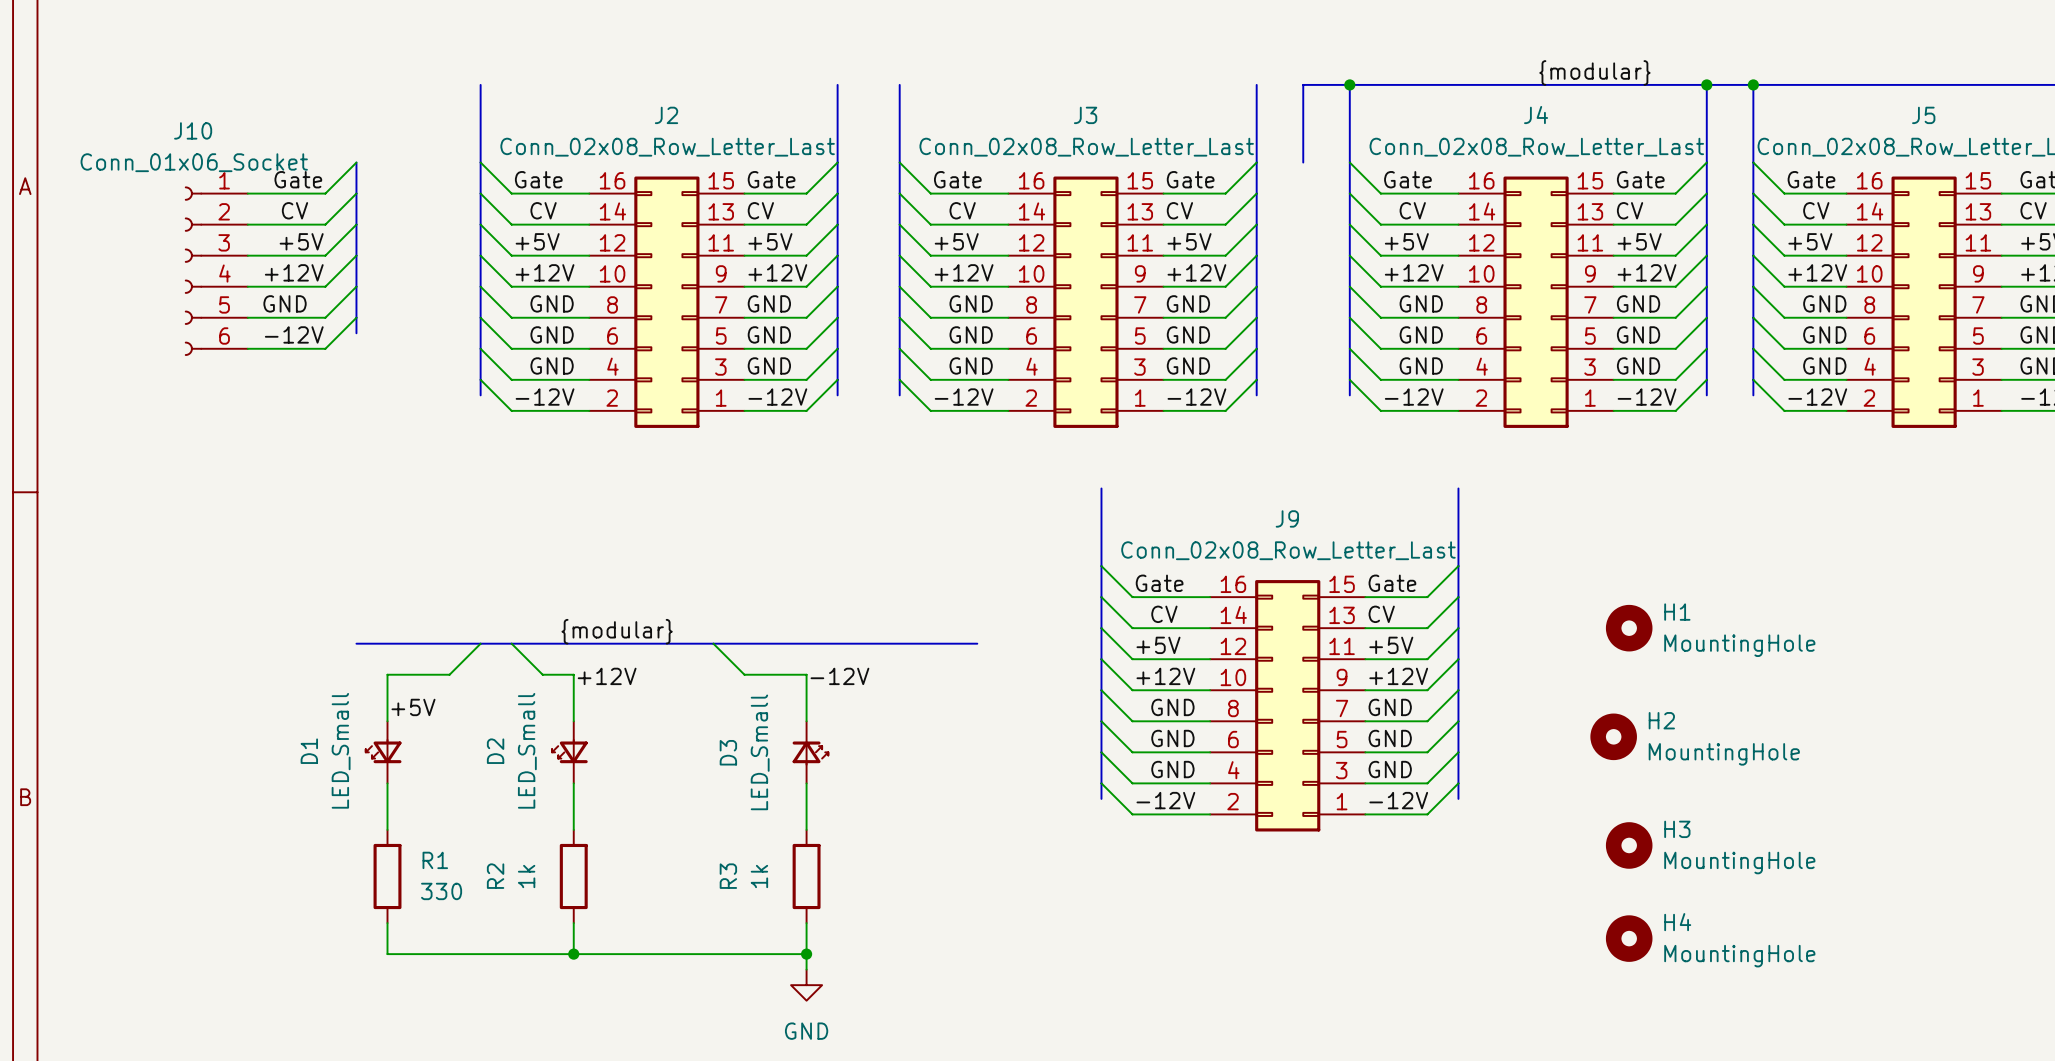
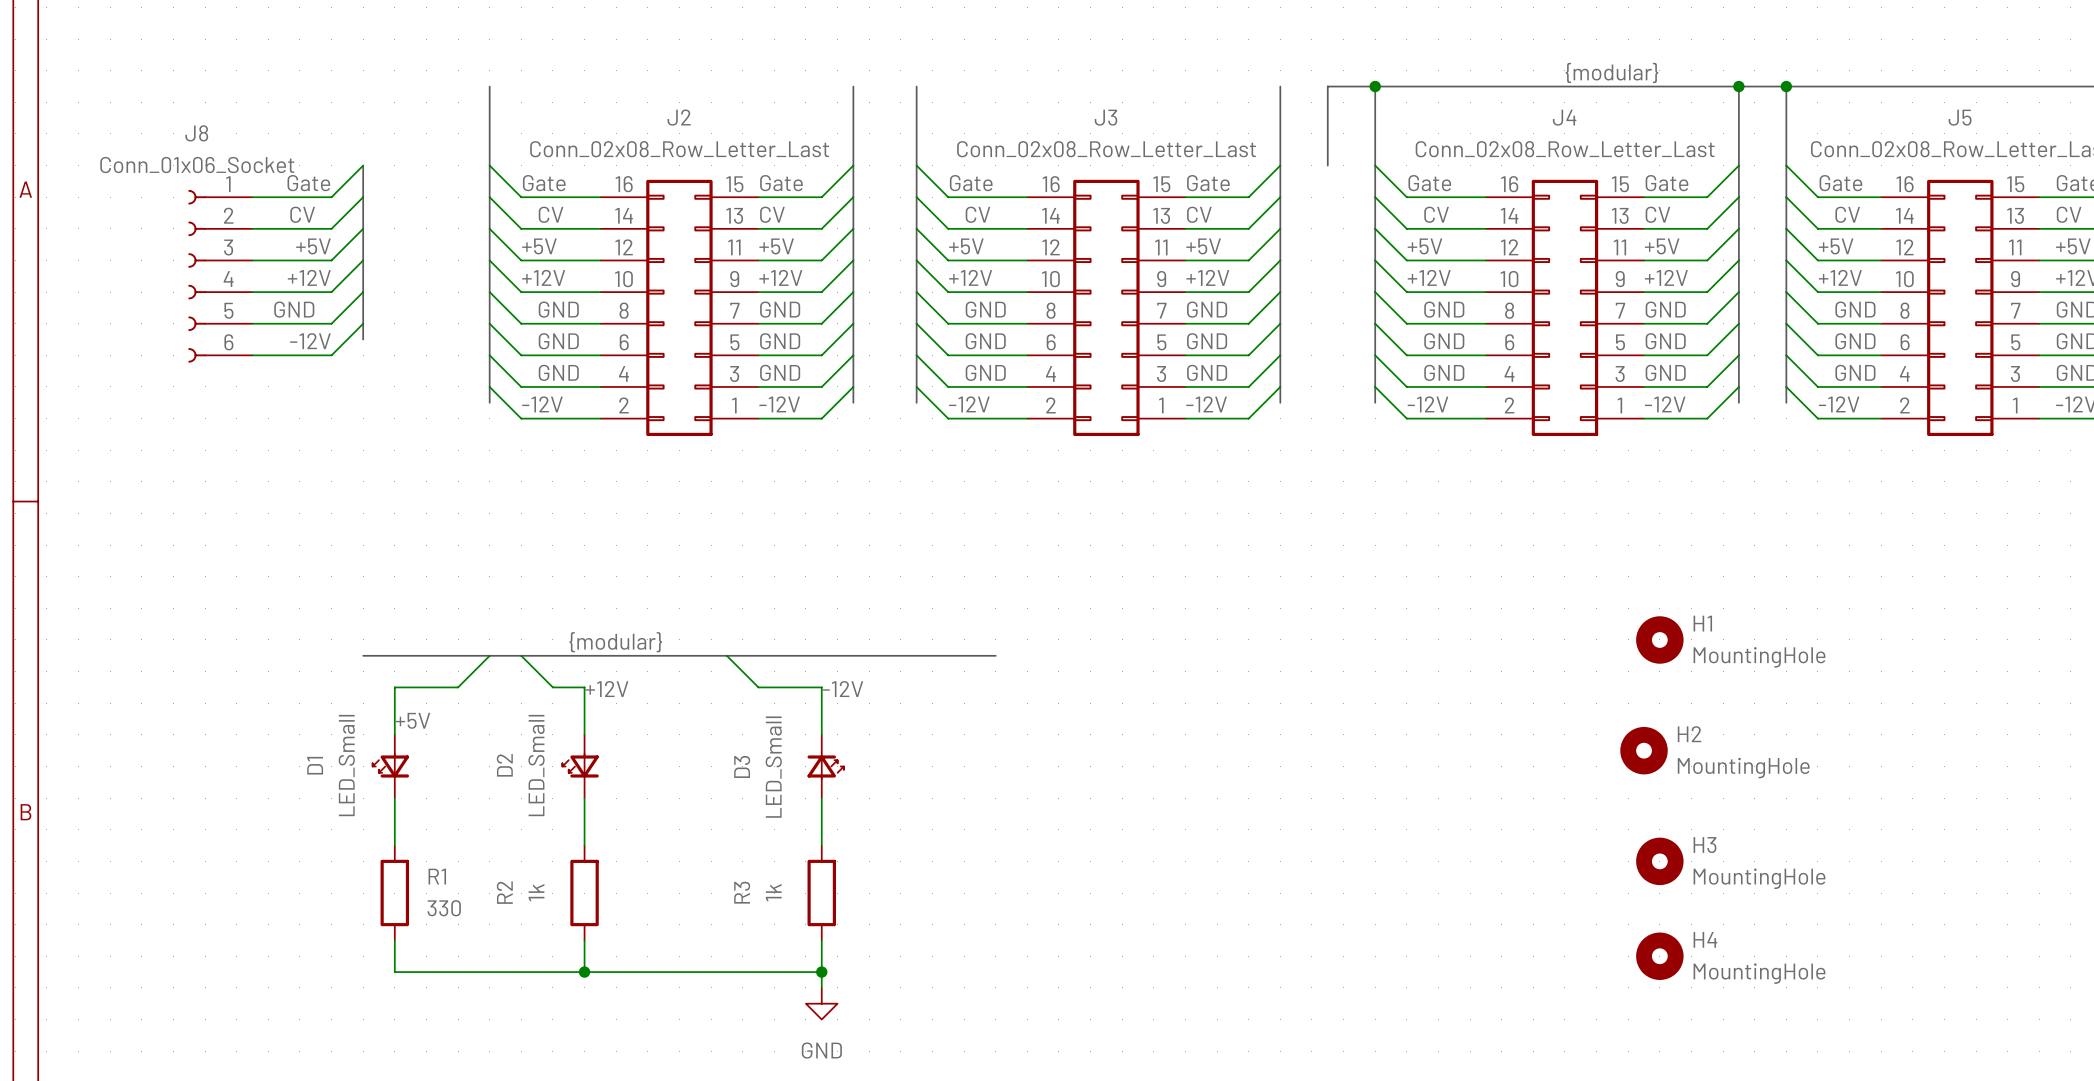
J10 name: J10 (193, 130) -> J8 (196, 133)
bus: (1101, 488) (1101, 798) -> none
bus: (1458, 488) (1458, 798) -> none
wire: (1101, 566) (1132, 597) (1210, 597) -> none
wire: (1458, 566) (1427, 597) (1365, 597) -> none
label: Gate (1159, 583) -> none
label: Gate (1392, 583) -> none
wire: (1101, 597) (1132, 628) (1210, 628) -> none
wire: (1458, 597) (1427, 628) (1365, 628) -> none
label: CV (1164, 614) -> none
label: CV (1381, 614) -> none
wire: (1101, 628) (1132, 659) (1210, 659) -> none
wire: (1458, 628) (1427, 659) (1365, 659) -> none
label: +5V (1158, 645) -> none
label: +5V (1391, 645) -> none
wire: (1101, 659) (1132, 690) (1210, 690) -> none
wire: (1458, 659) (1427, 690) (1365, 690) -> none
label: +12V (1165, 676) -> none
label: +12V (1398, 676) -> none
wire: (1101, 690) (1132, 721) (1210, 721) -> none
wire: (1458, 690) (1427, 721) (1365, 721) -> none
J9: Conn_02x08_Row_Letter_Last (1287, 705) -> none
label: GND (1172, 707) -> none
label: GND (1390, 707) -> none
wire: (1101, 721) (1132, 752) (1210, 752) -> none
wire: (1458, 721) (1427, 752) (1365, 752) -> none
label: GND (1172, 738) -> none
label: GND (1390, 738) -> none
wire: (1101, 752) (1132, 783) (1210, 783) -> none
wire: (1458, 752) (1427, 783) (1365, 783) -> none
label: GND (1172, 769) -> none
label: GND (1390, 769) -> none
wire: (1101, 783) (1132, 814) (1210, 814) -> none
wire: (1458, 783) (1427, 814) (1365, 814) -> none
label: -12V (1165, 800) -> none
label: -12V (1398, 800) -> none

